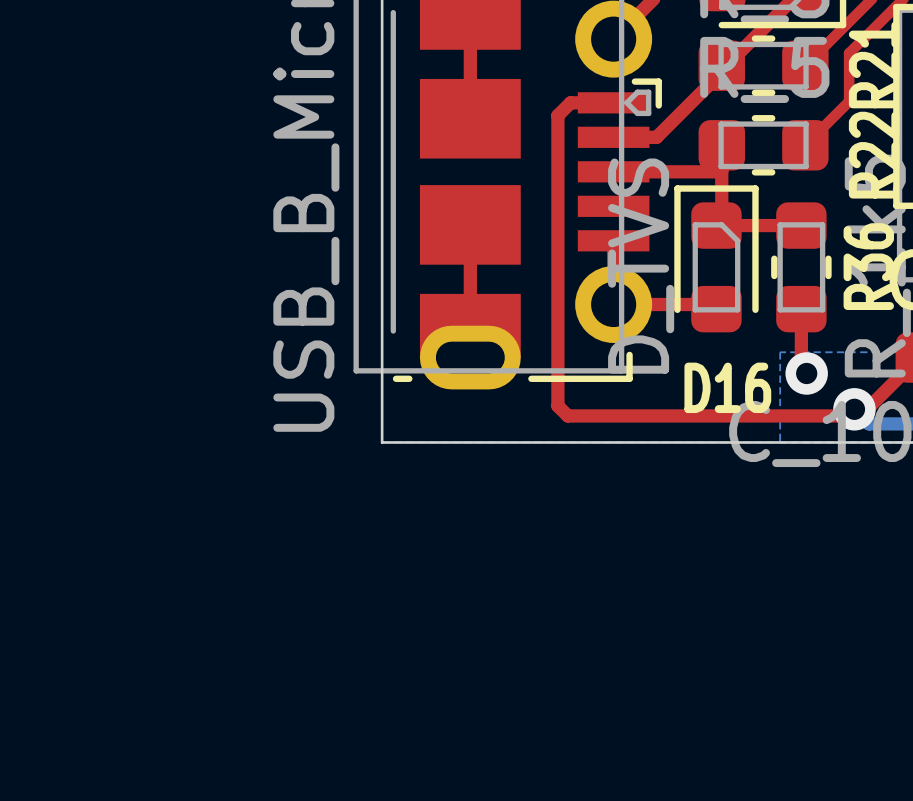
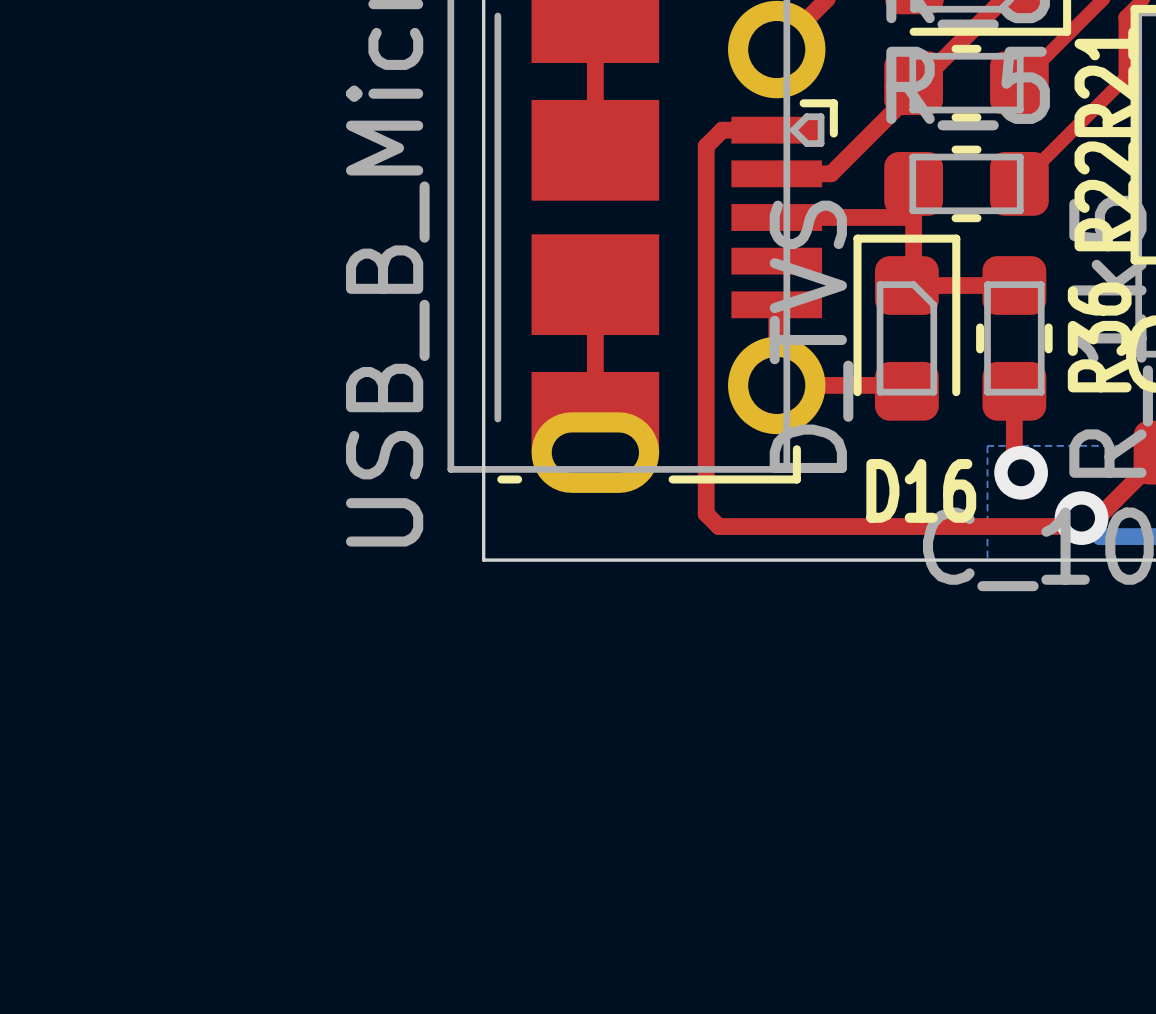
top track: (888, 13) (849, 53) (849, 101) -> (1125, 17) (1125, 78) (1074, 128)

